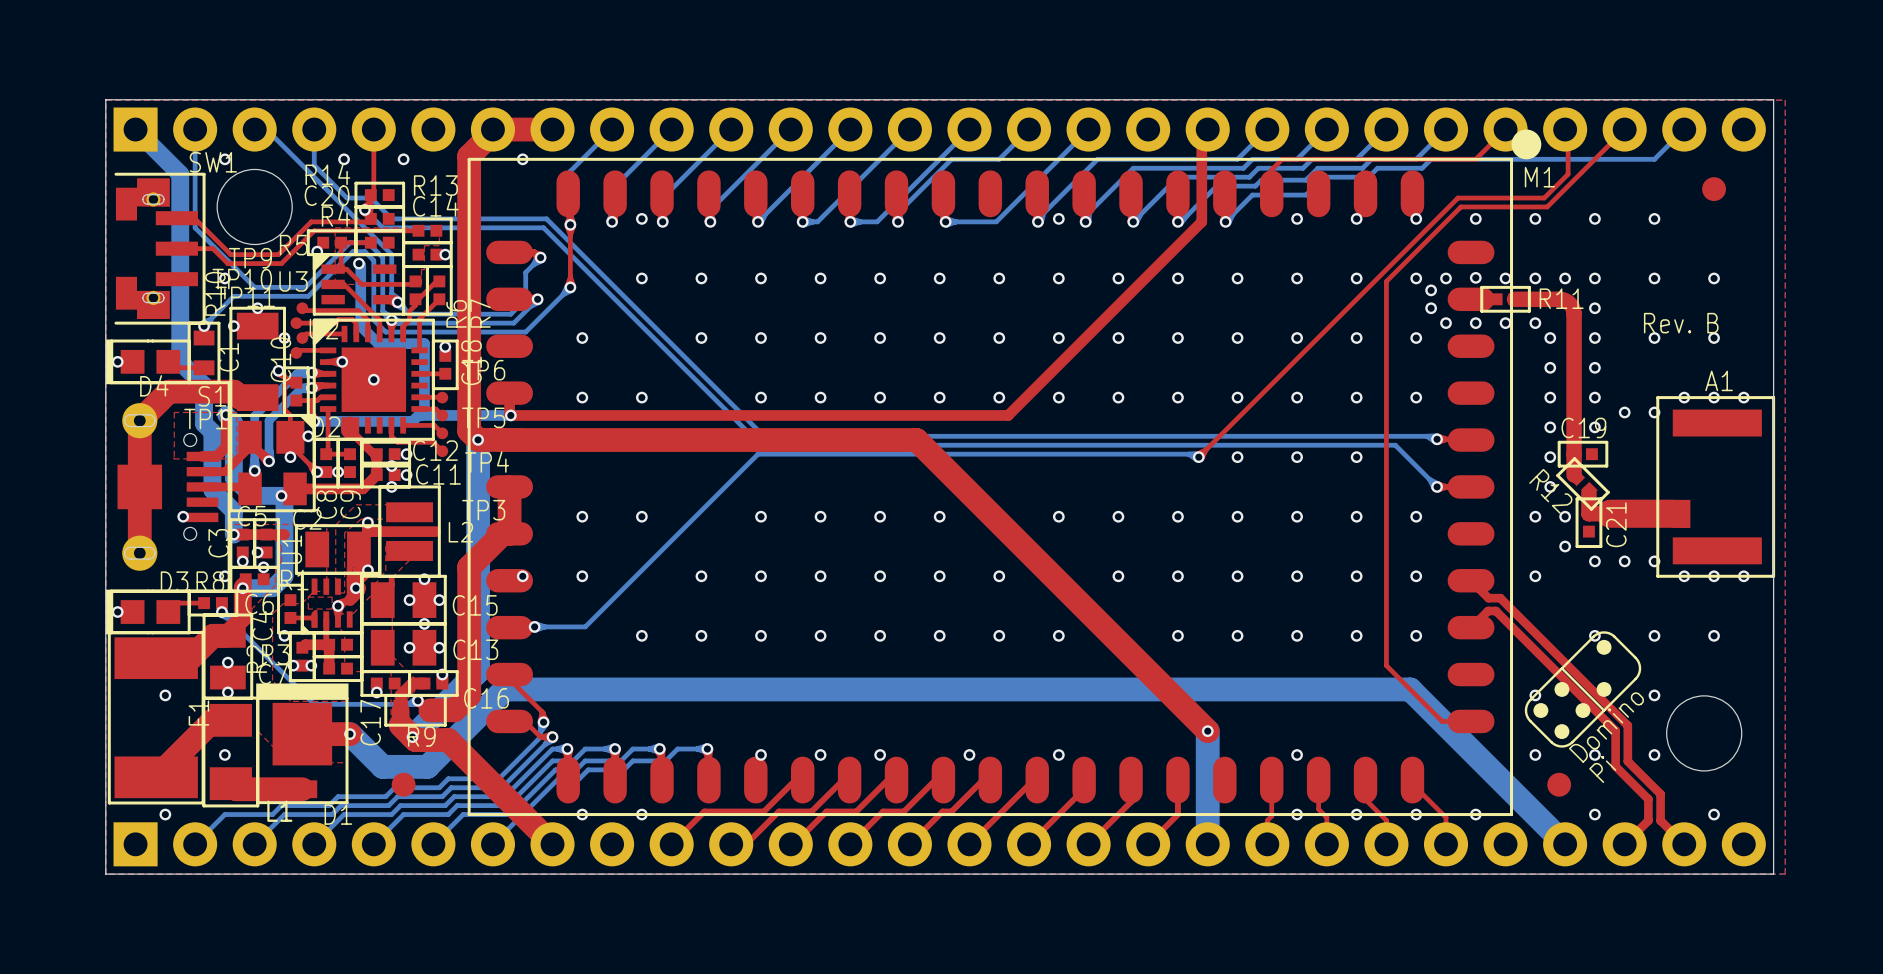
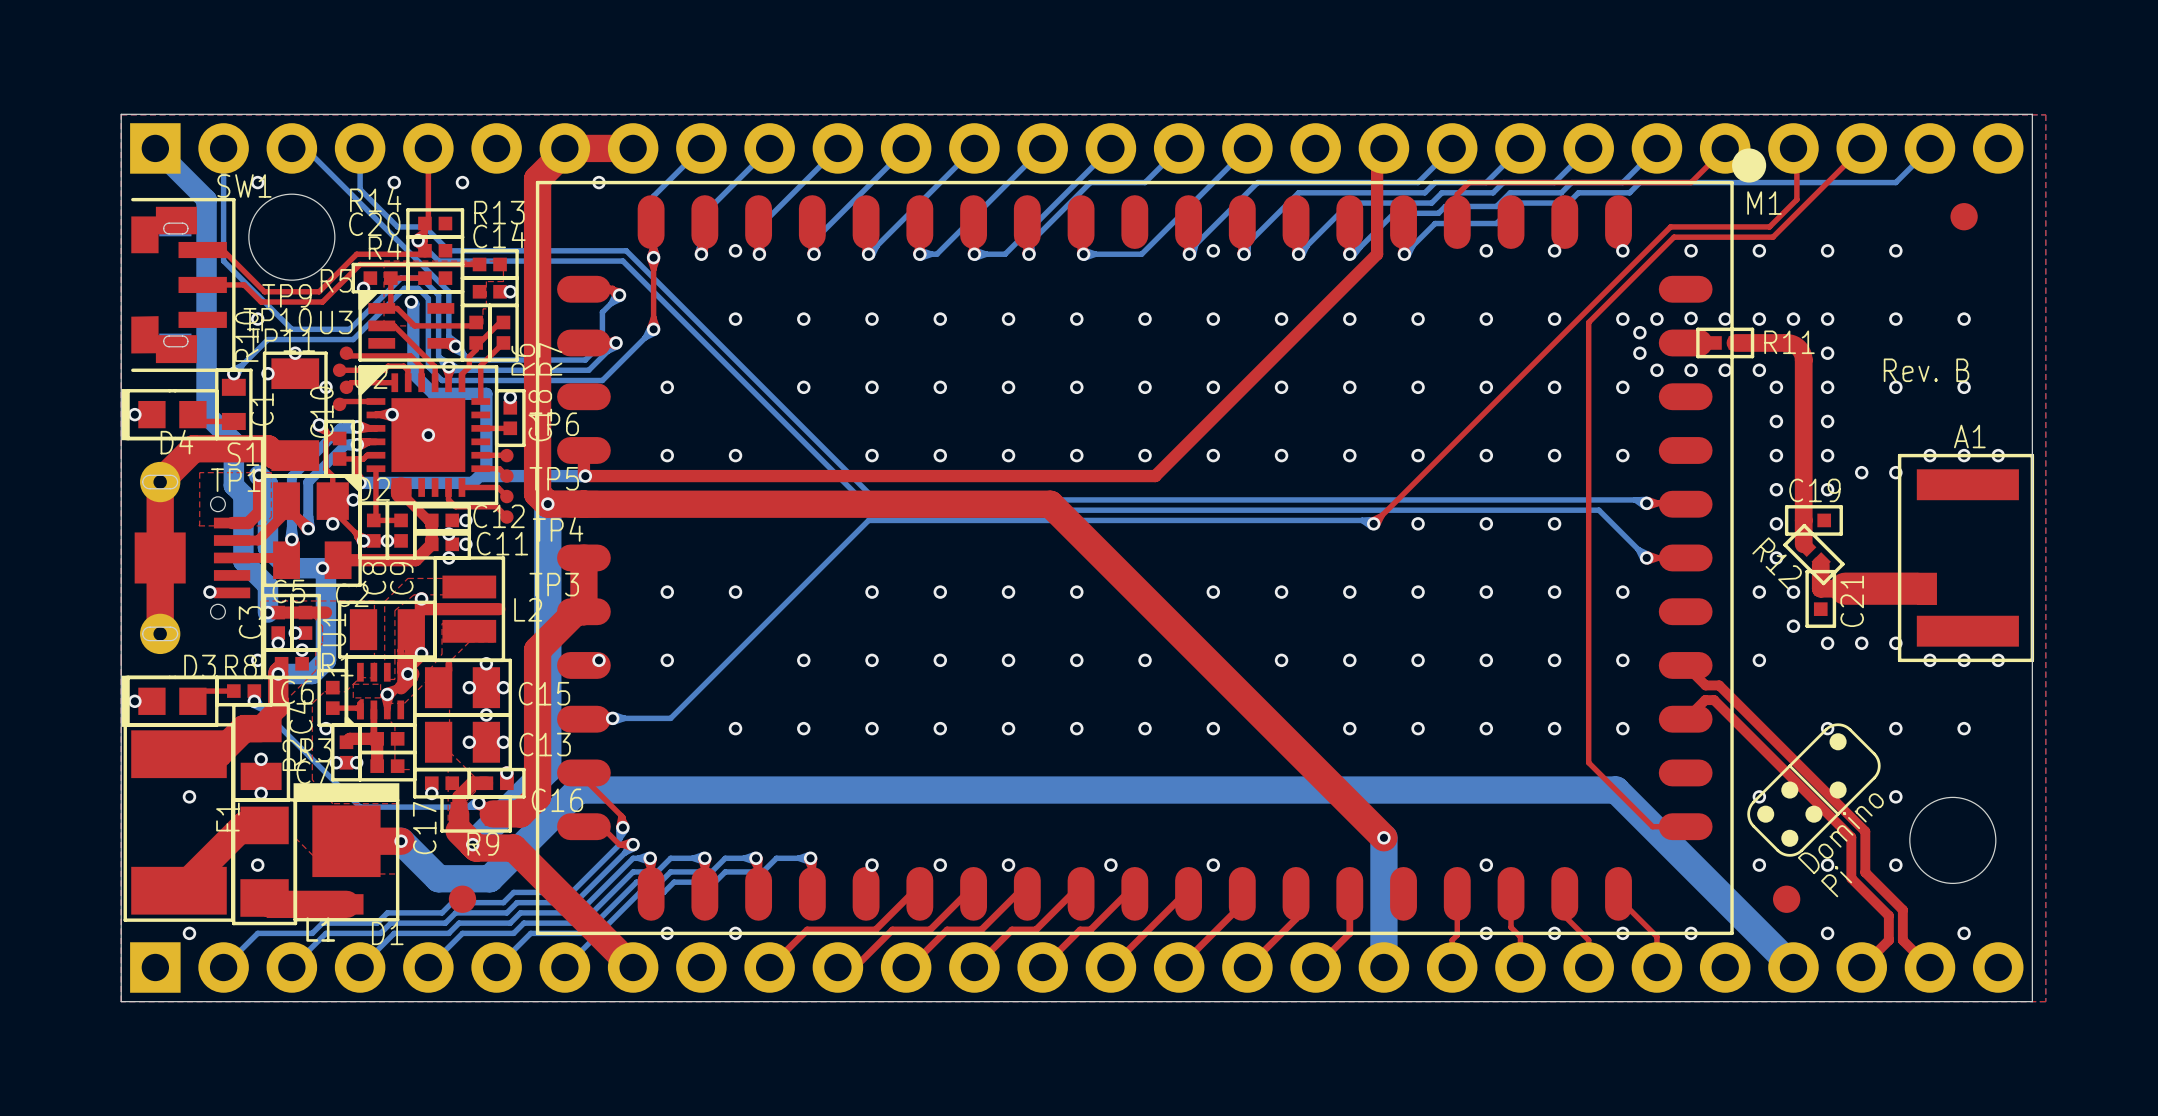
SW1 footprint: [114, 172, 206, 325] -> [131, 197, 236, 372]

